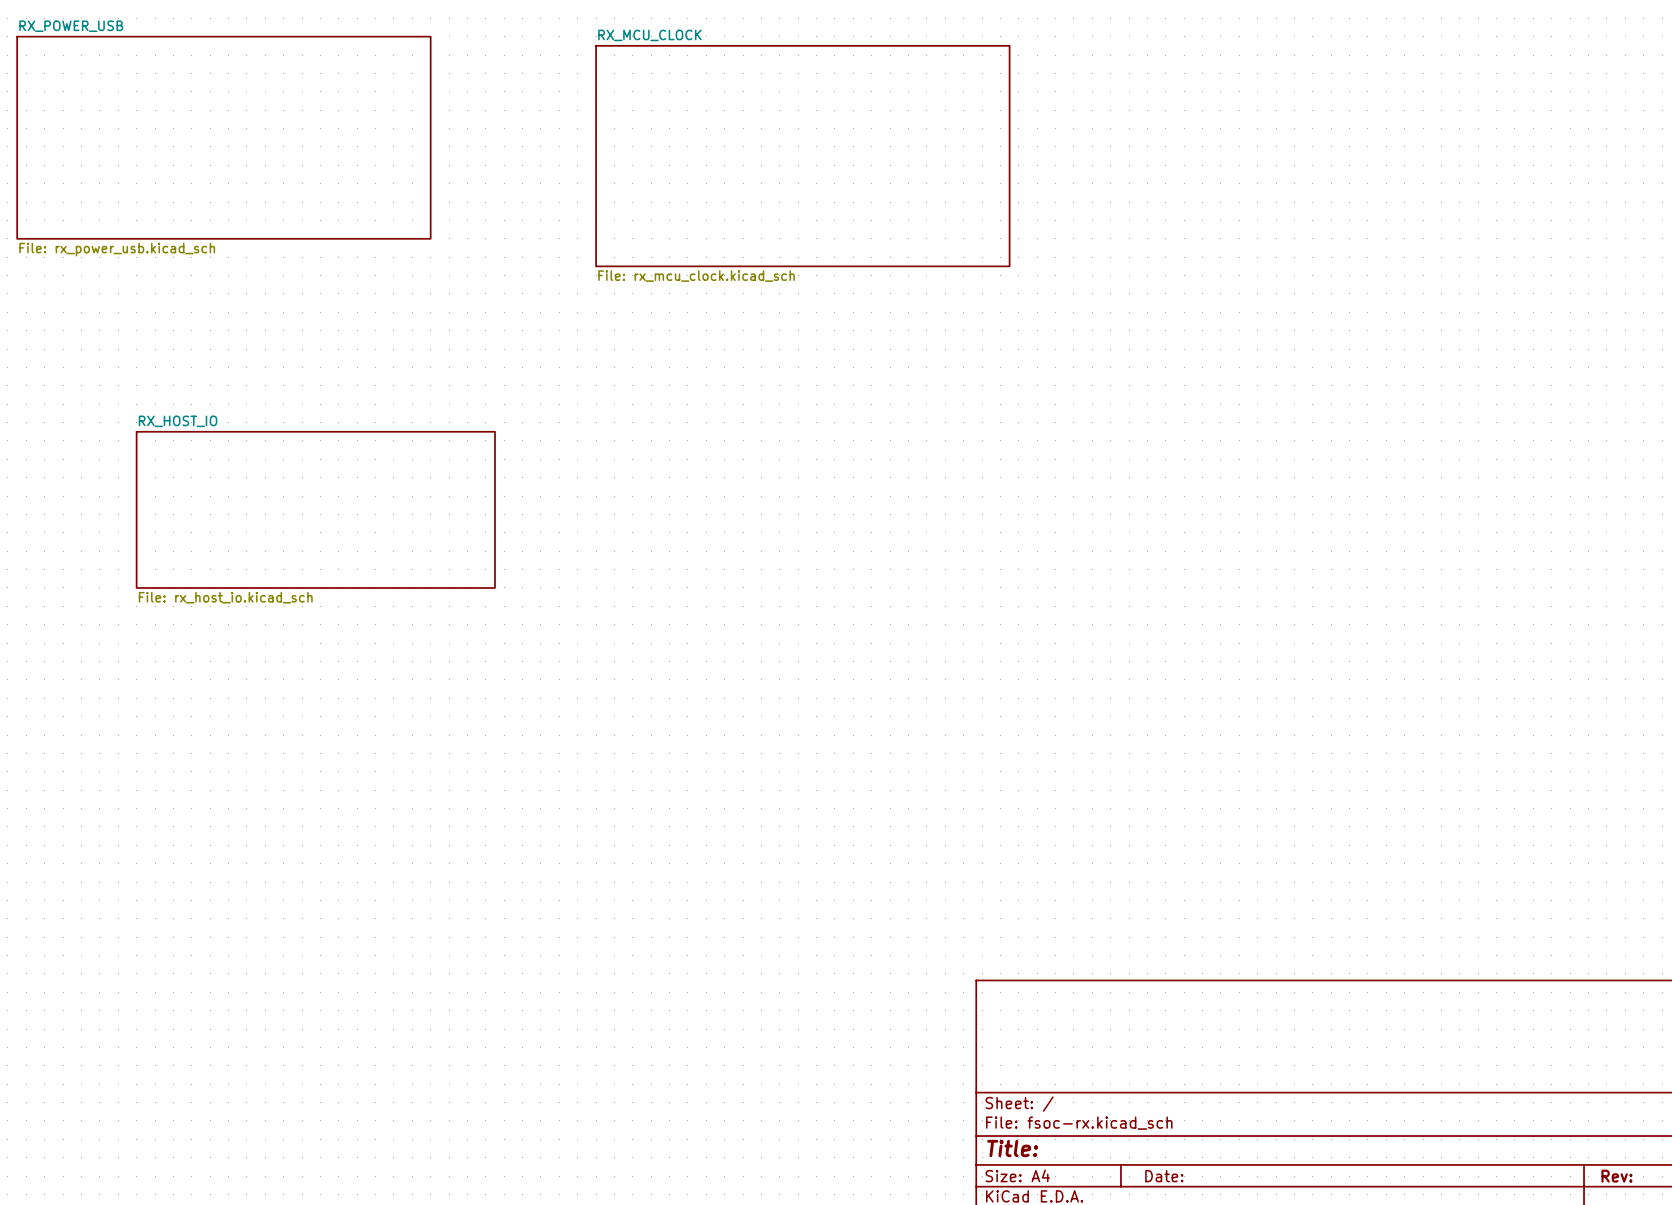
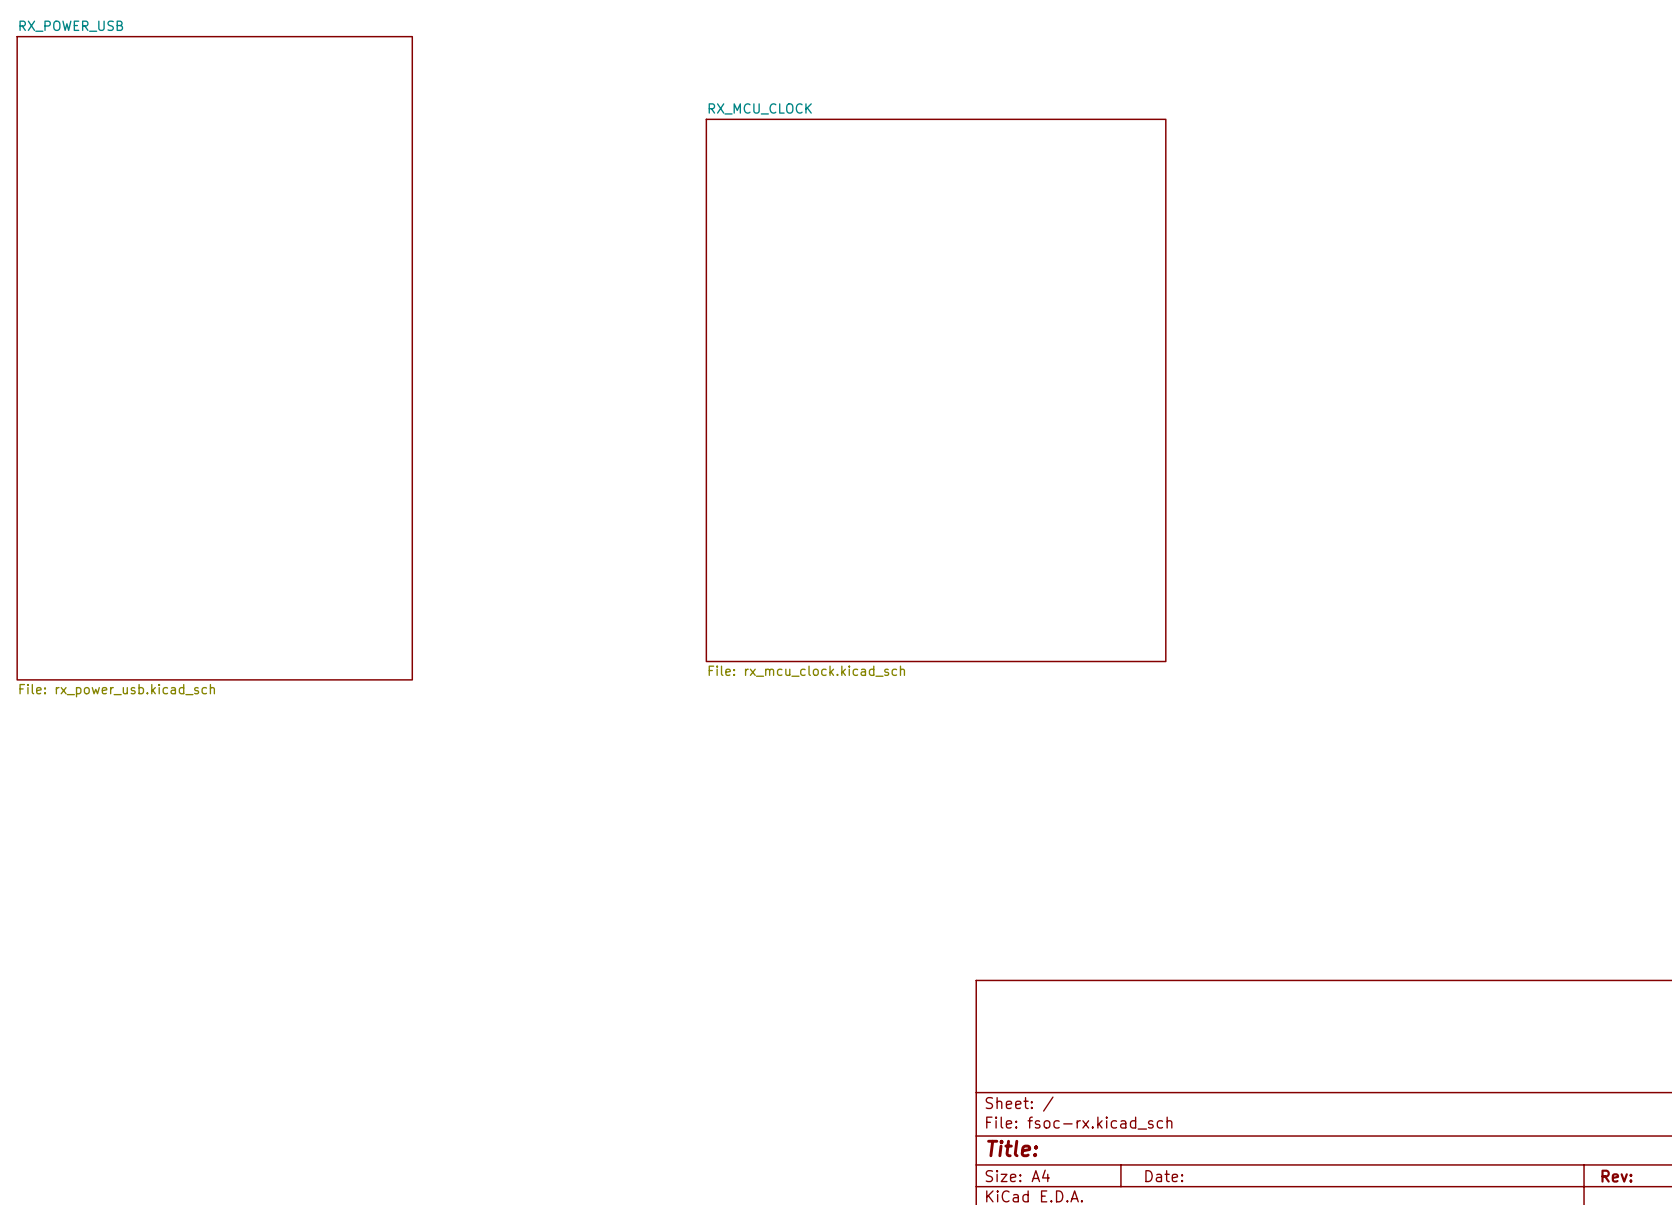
sheet RX_POWER_USB: File: rx_power_usb.kicad_sch (223, 137) -> none
sheet RX_MCU_CLOCK: File: rx_mcu_clock.kicad_sch (802, 156) -> none
sheet RX_POWER_USB: none -> File: rx_power_usb.kicad_sch (214, 358)
sheet RX_MCU_CLOCK: none -> File: rx_mcu_clock.kicad_sch (936, 390)
sheet RX_HOST_IO: File: rx_host_io.kicad_sch (315, 509) -> none

